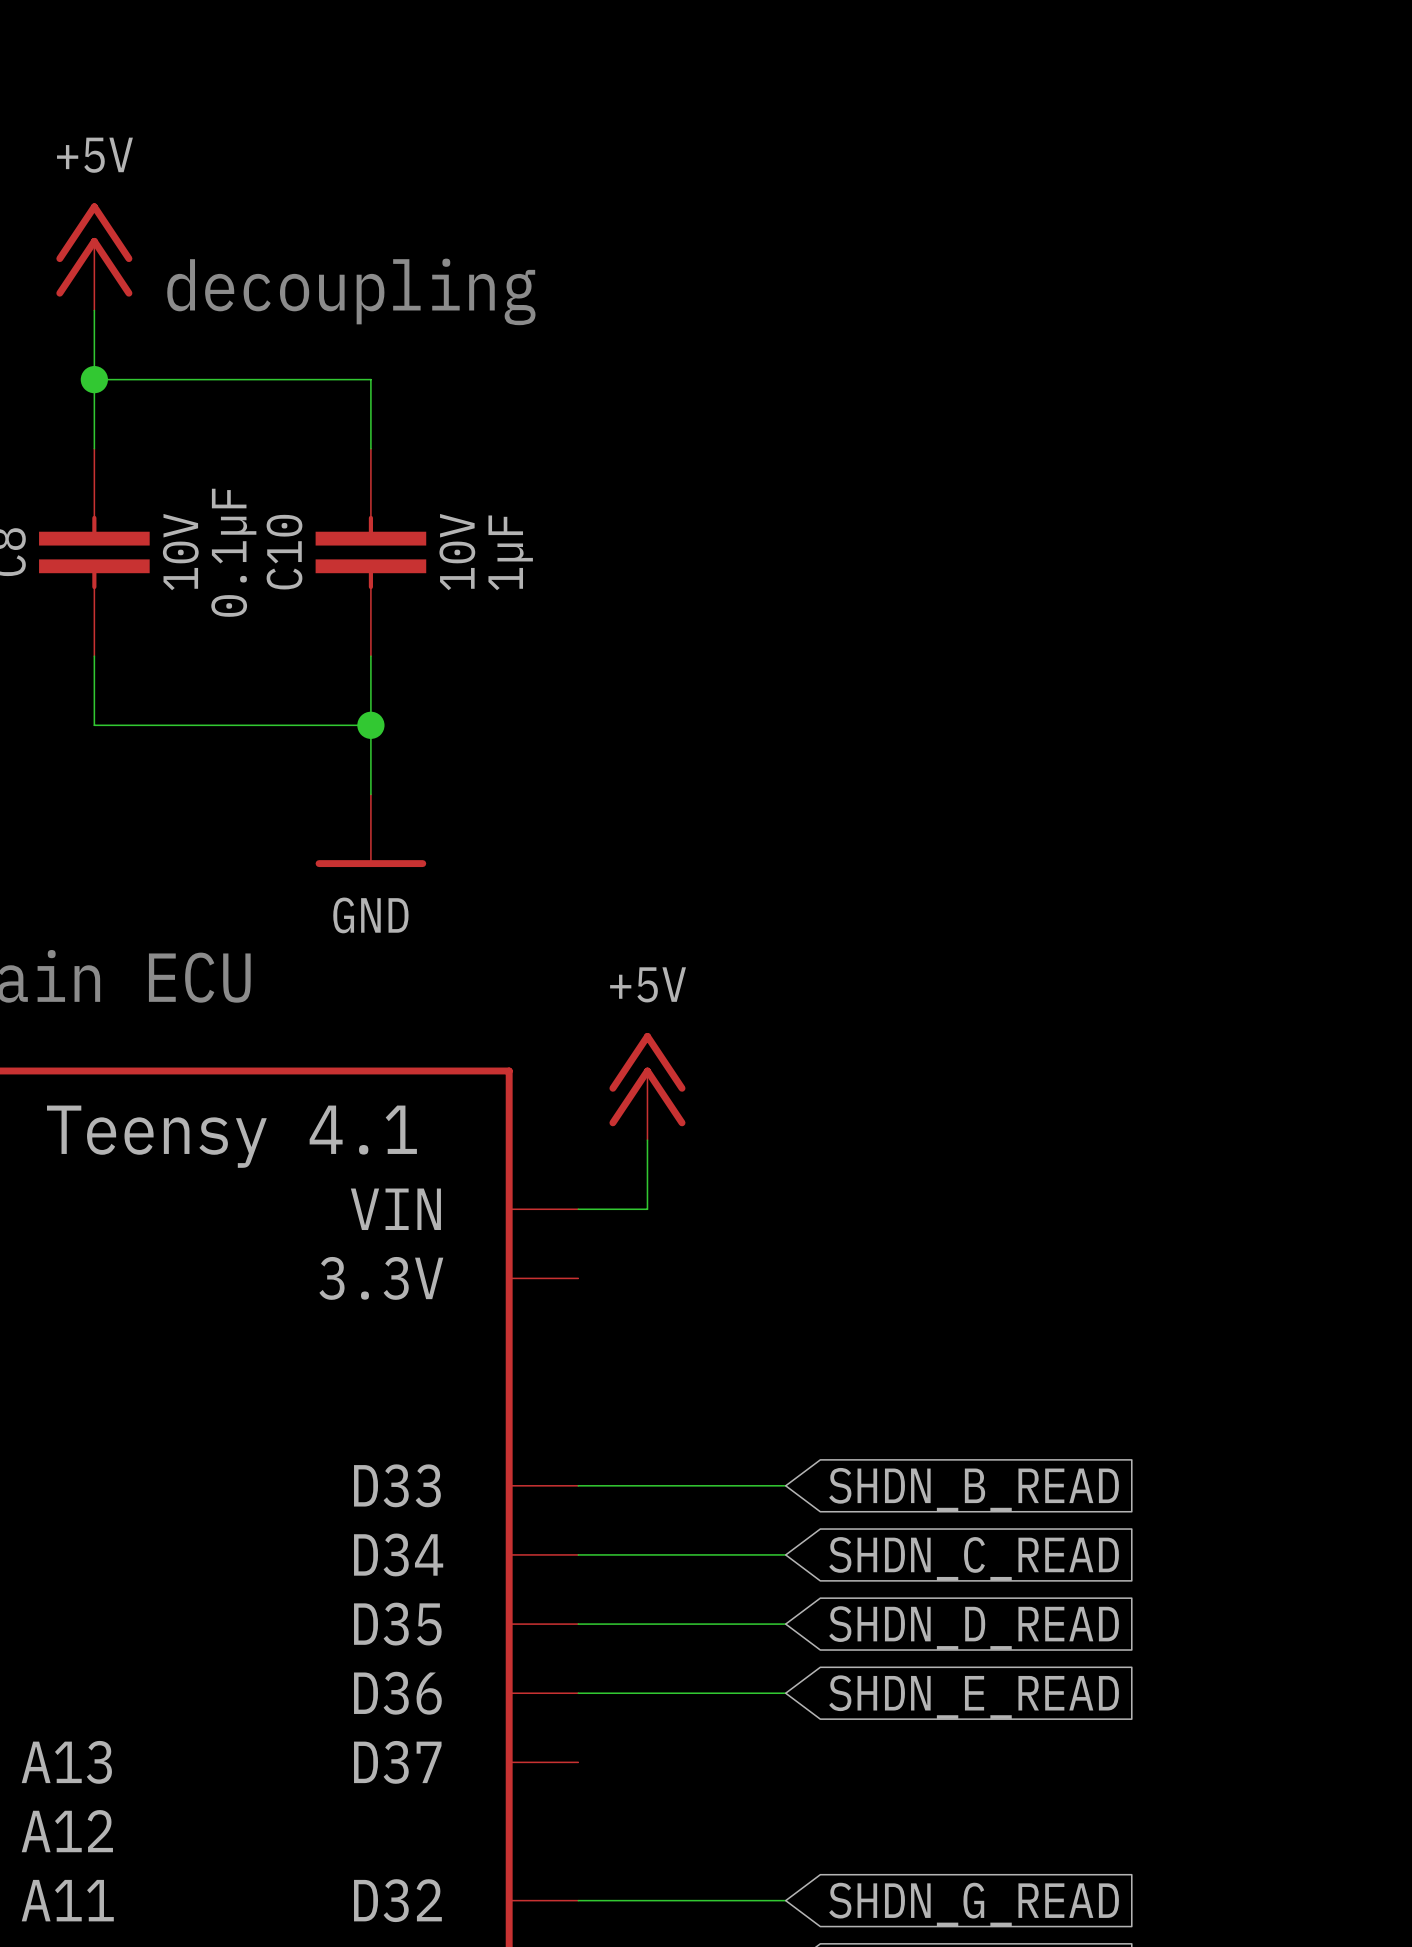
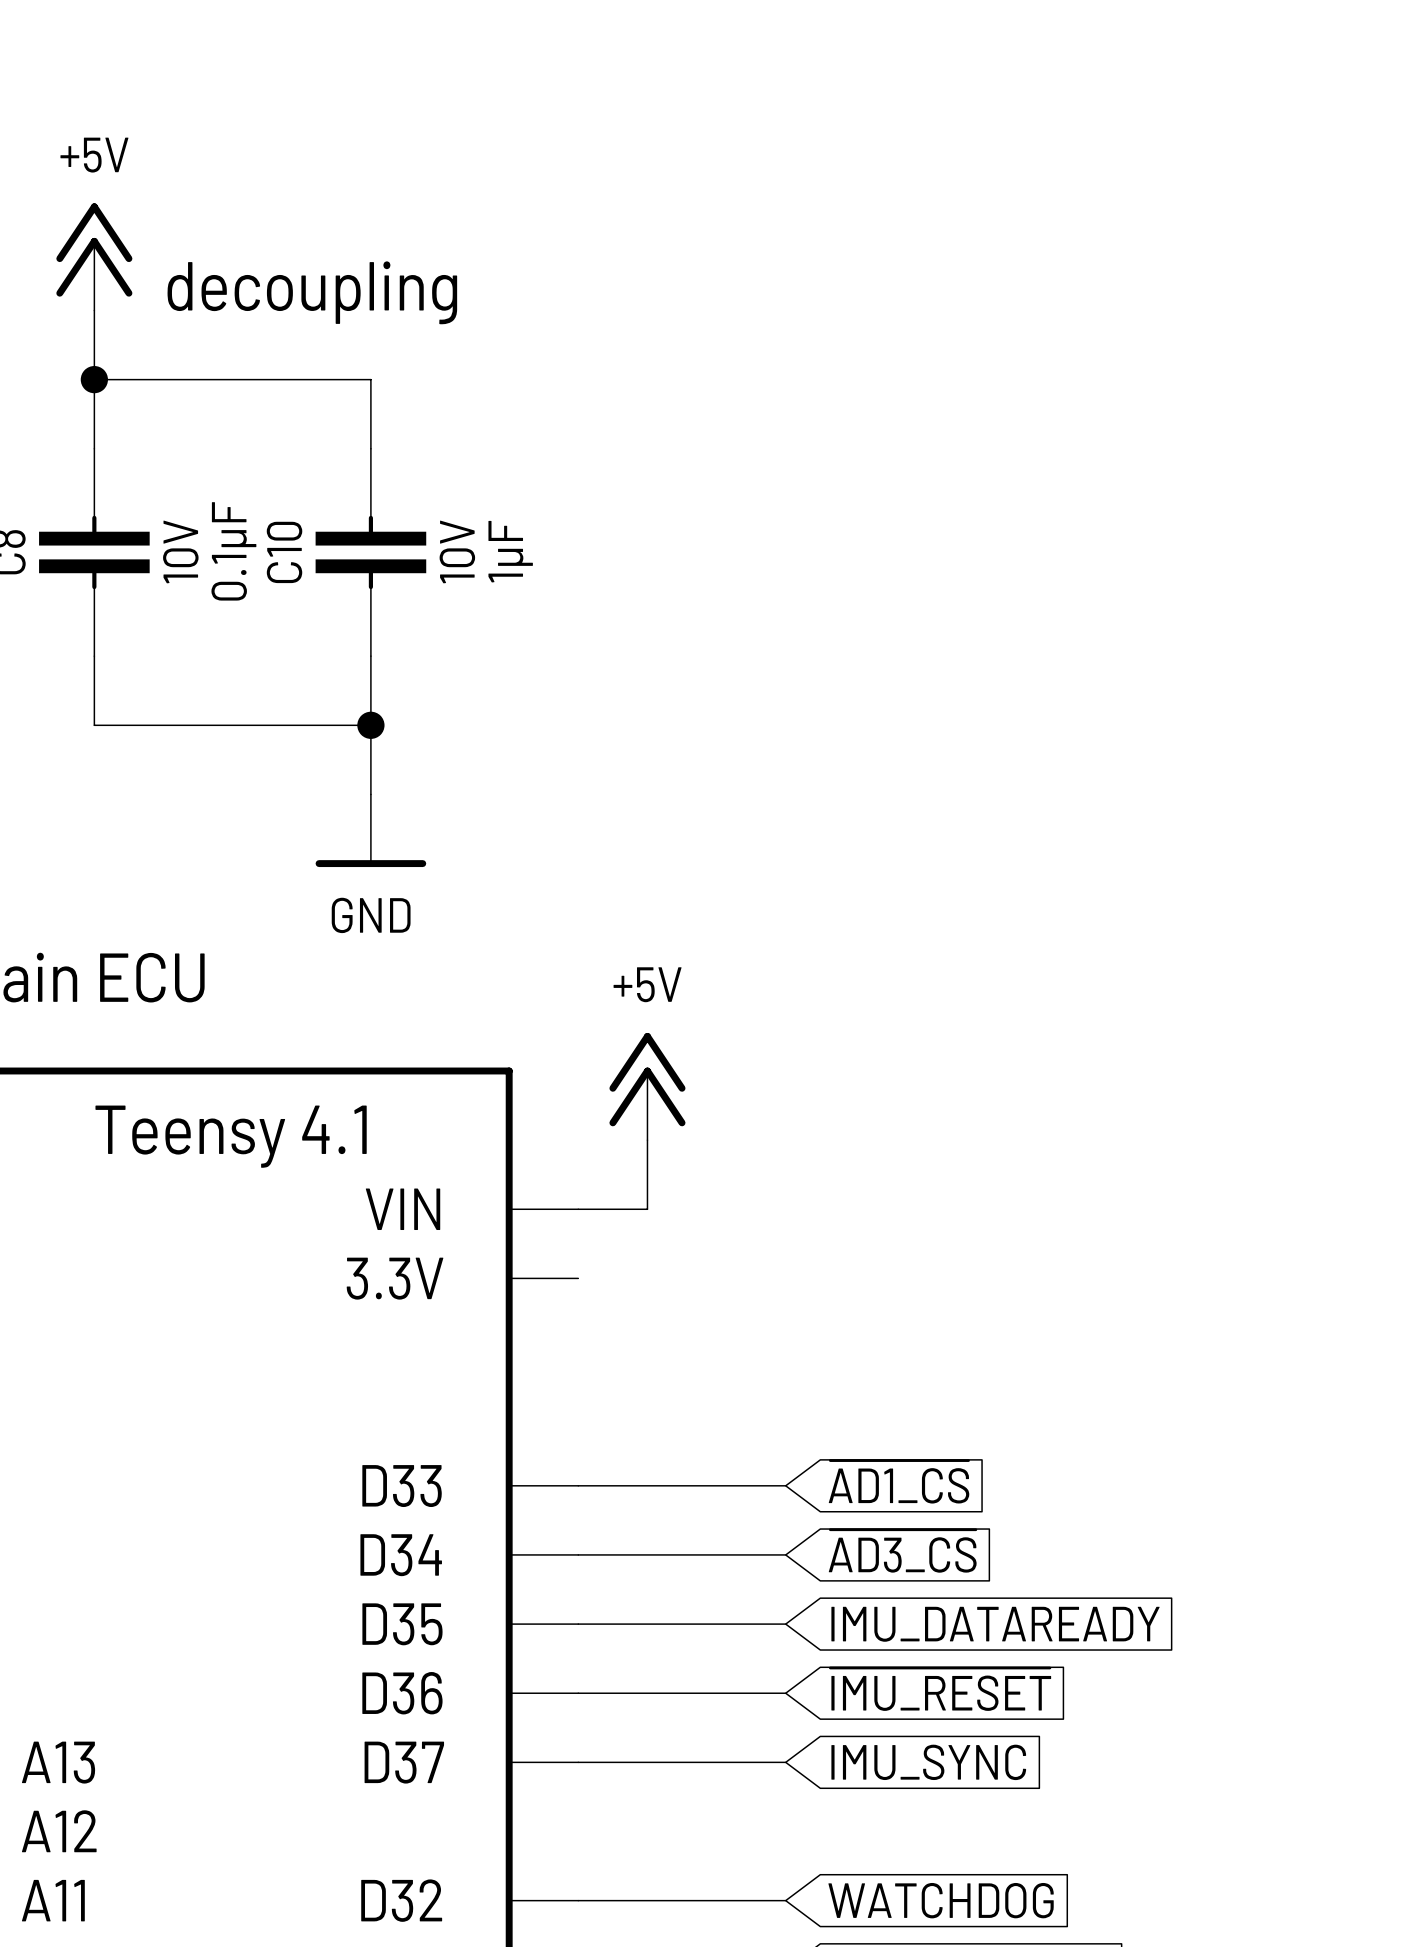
global label: SHDN_B_READ (974, 1489) -> ~{AD1_CS} (898, 1482)
global label: SHDN_C_READ (974, 1558) -> ~{AD3_CS} (902, 1551)
global label: SHDN_D_READ (974, 1627) -> IMU_DATAREADY (995, 1624)
global label: SHDN_E_READ (974, 1697) -> ~{IMU_RESET} (940, 1689)
wire: none -> (578, 1762) (785, 1762)
global label: none -> IMU_SYNC (928, 1762)
global label: SHDN_G_READ (974, 1904) -> WATCHDOG (941, 1900)

